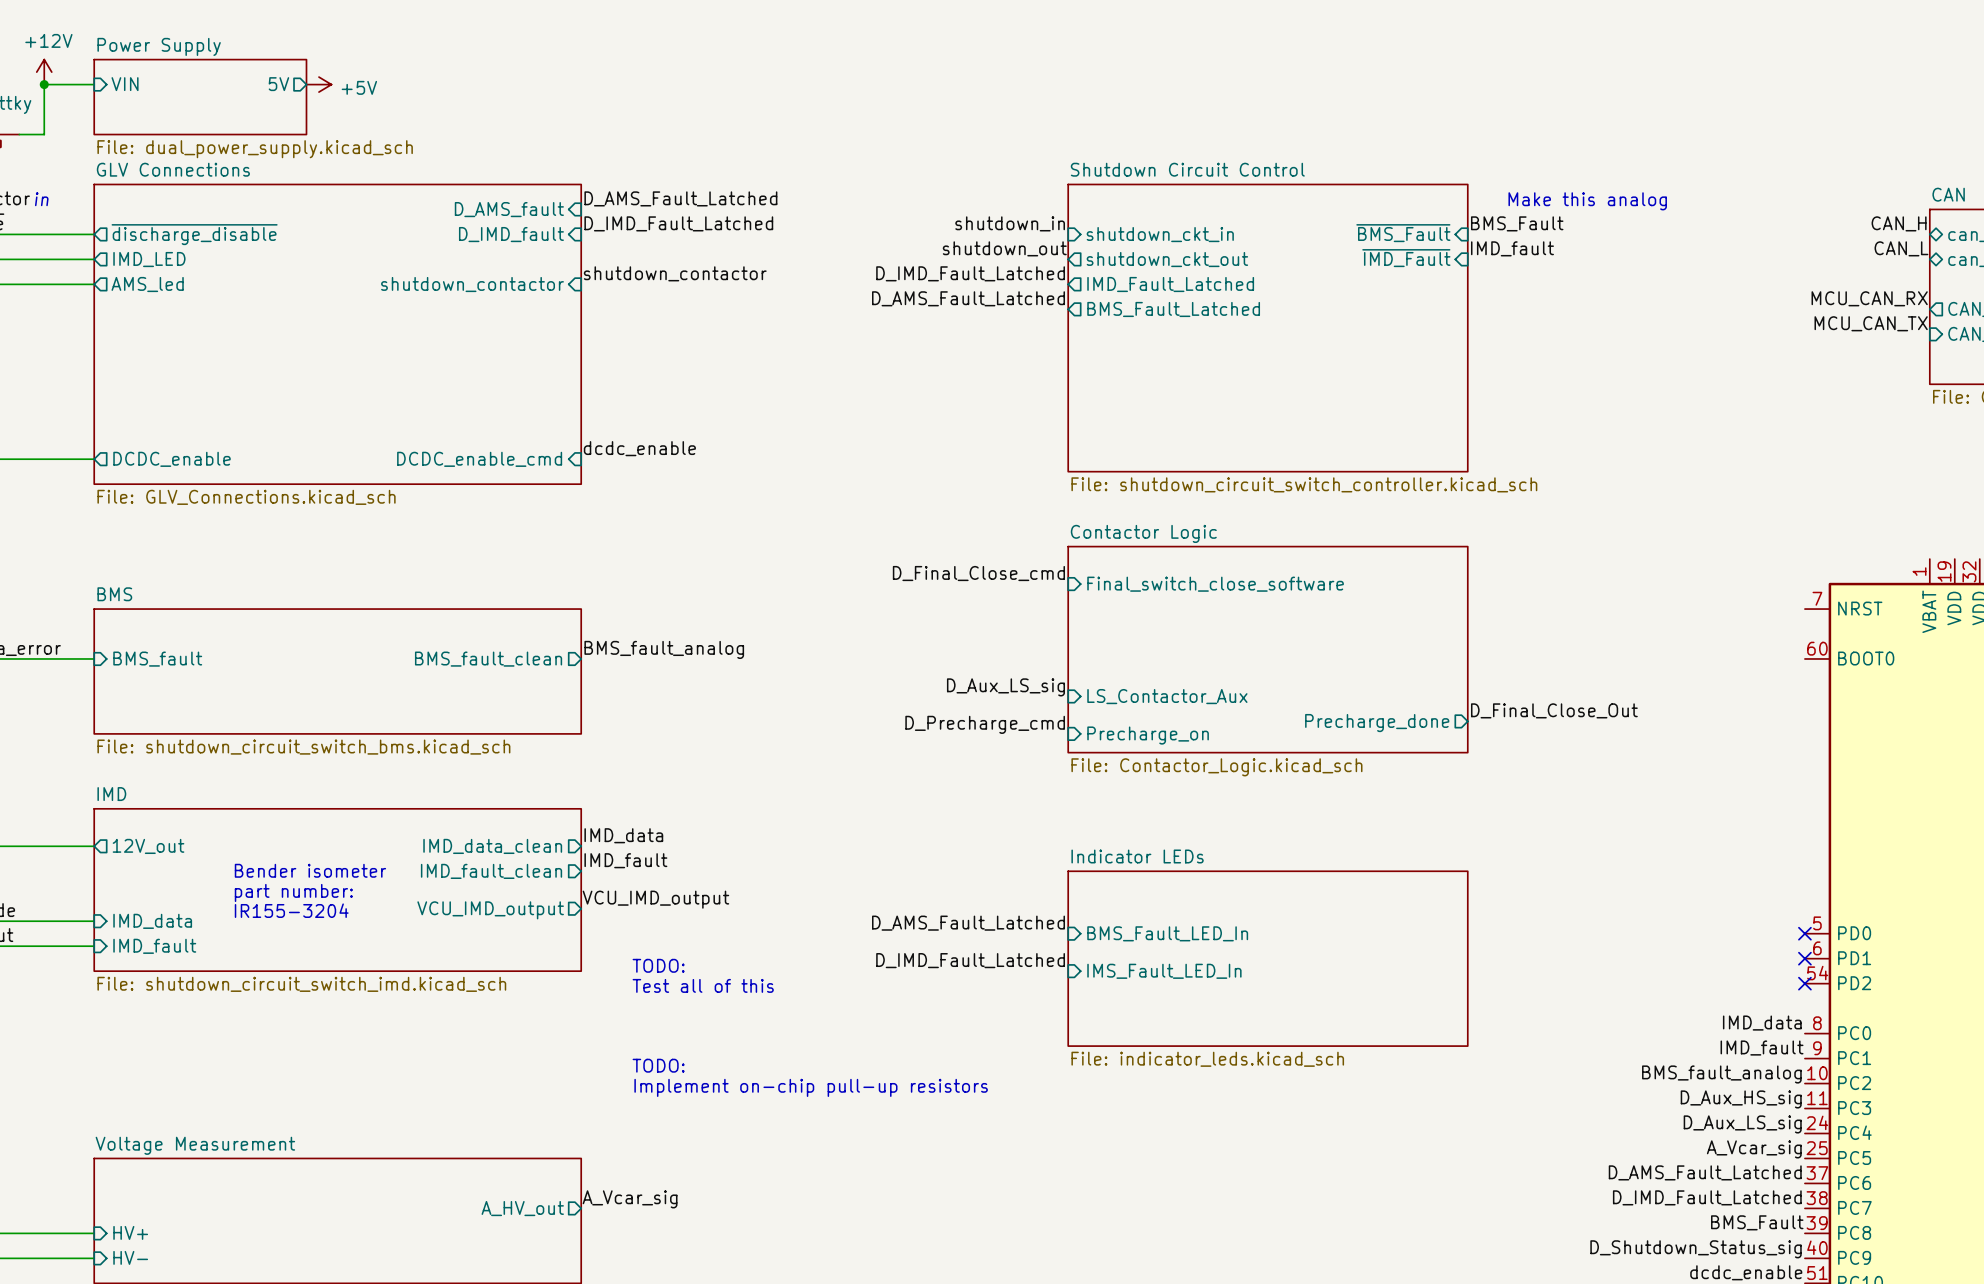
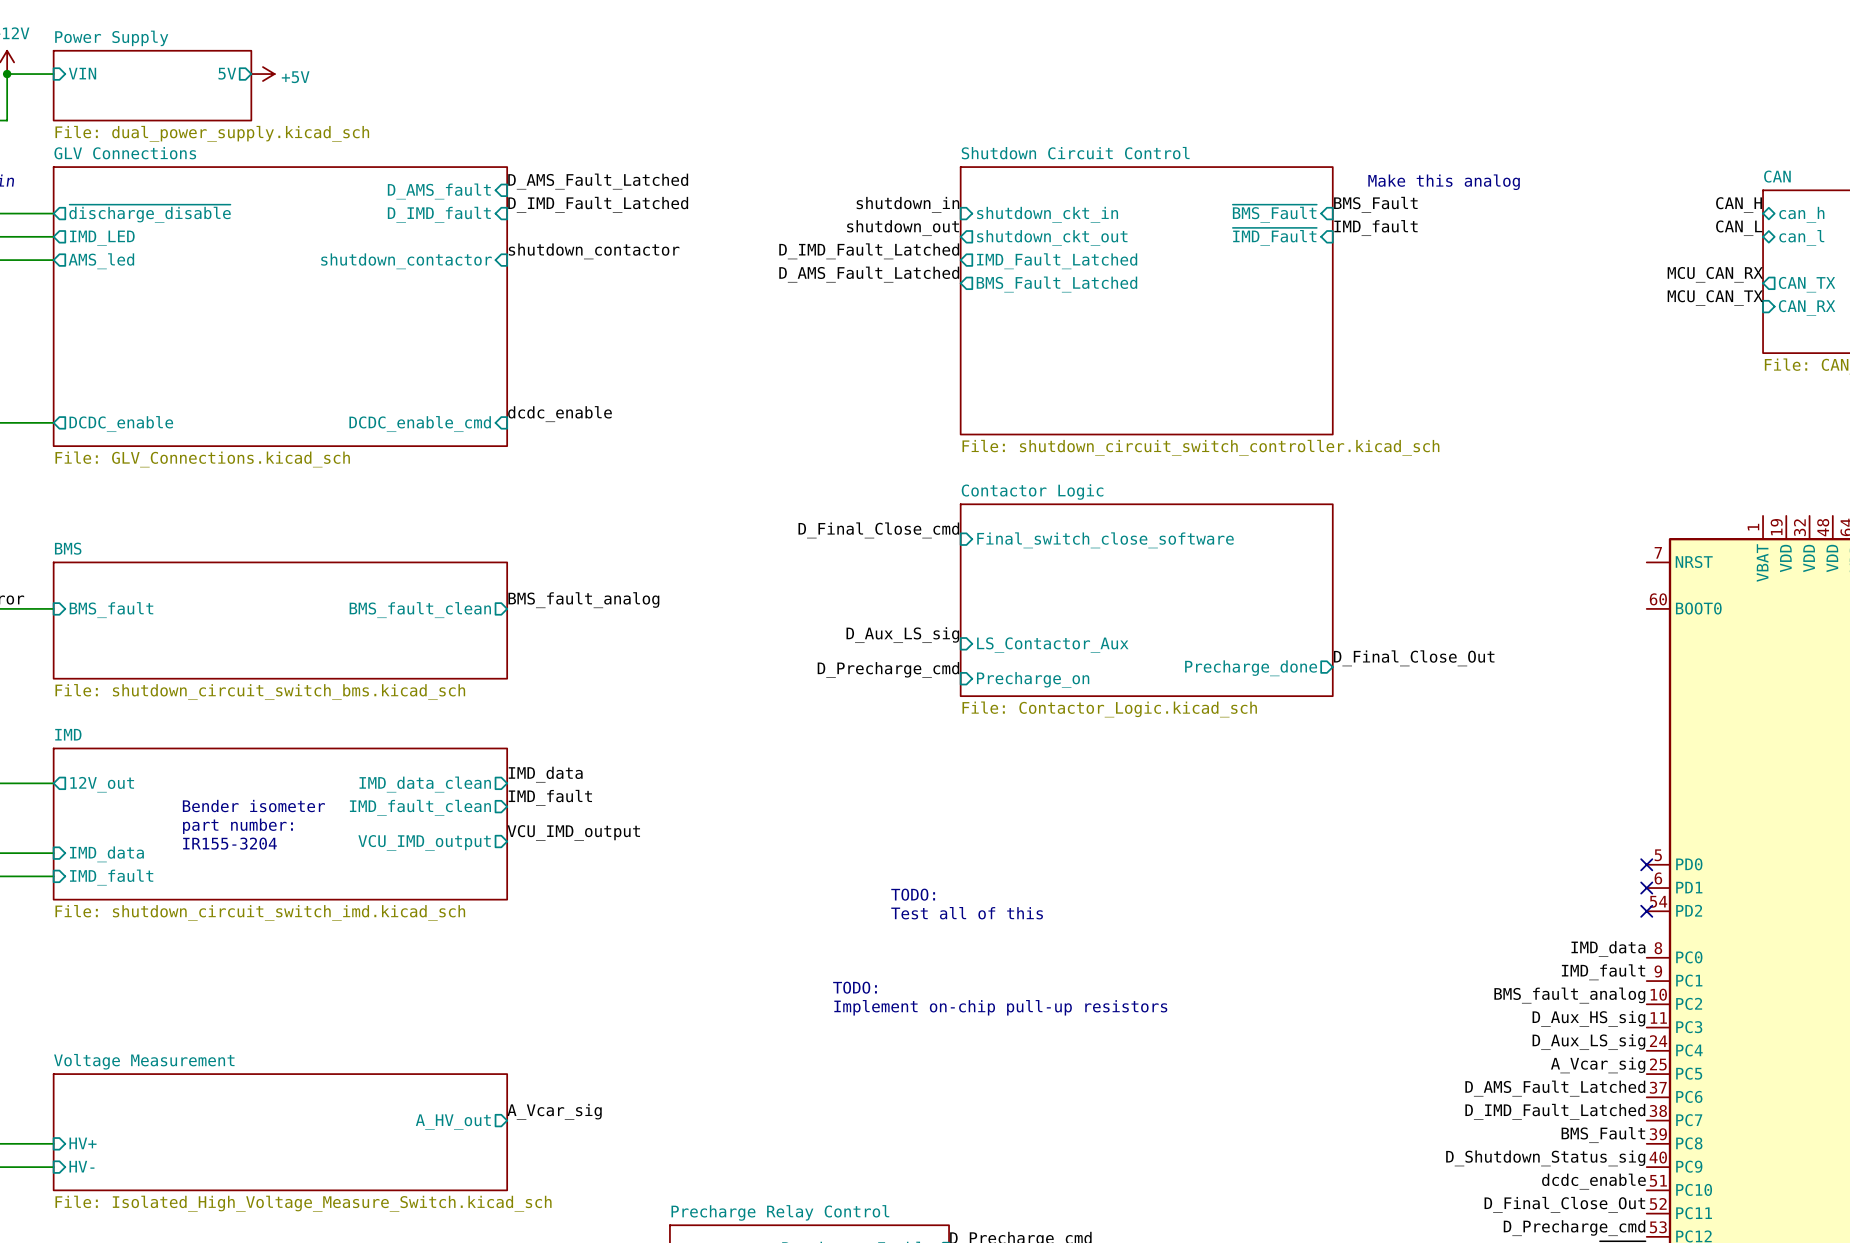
label: D_AMS_Fault_Latched (968, 923) -> none
sheet pin: BMS_Fault_LED_In (1167, 933) -> none
sheet Indicator LEDs: File: indicator_leds.kicad_sch (1267, 958) -> none
label: D_IMD_Fault_Latched (970, 960) -> none
text: TODO: (658, 965) -> none
text: none -> TODO: (913, 894)
sheet pin: IMS_Fault_LED_In (1164, 971) -> none
text: Test all of this (703, 985) -> none
text: none -> Test all of this (967, 913)
text: TODO: (658, 1065) -> none
text: none -> TODO: (855, 987)
text: Implement on-chip pull-up resistors (811, 1087) -> none
text: none -> Implement on-chip pull-up resistors (1000, 1007)

